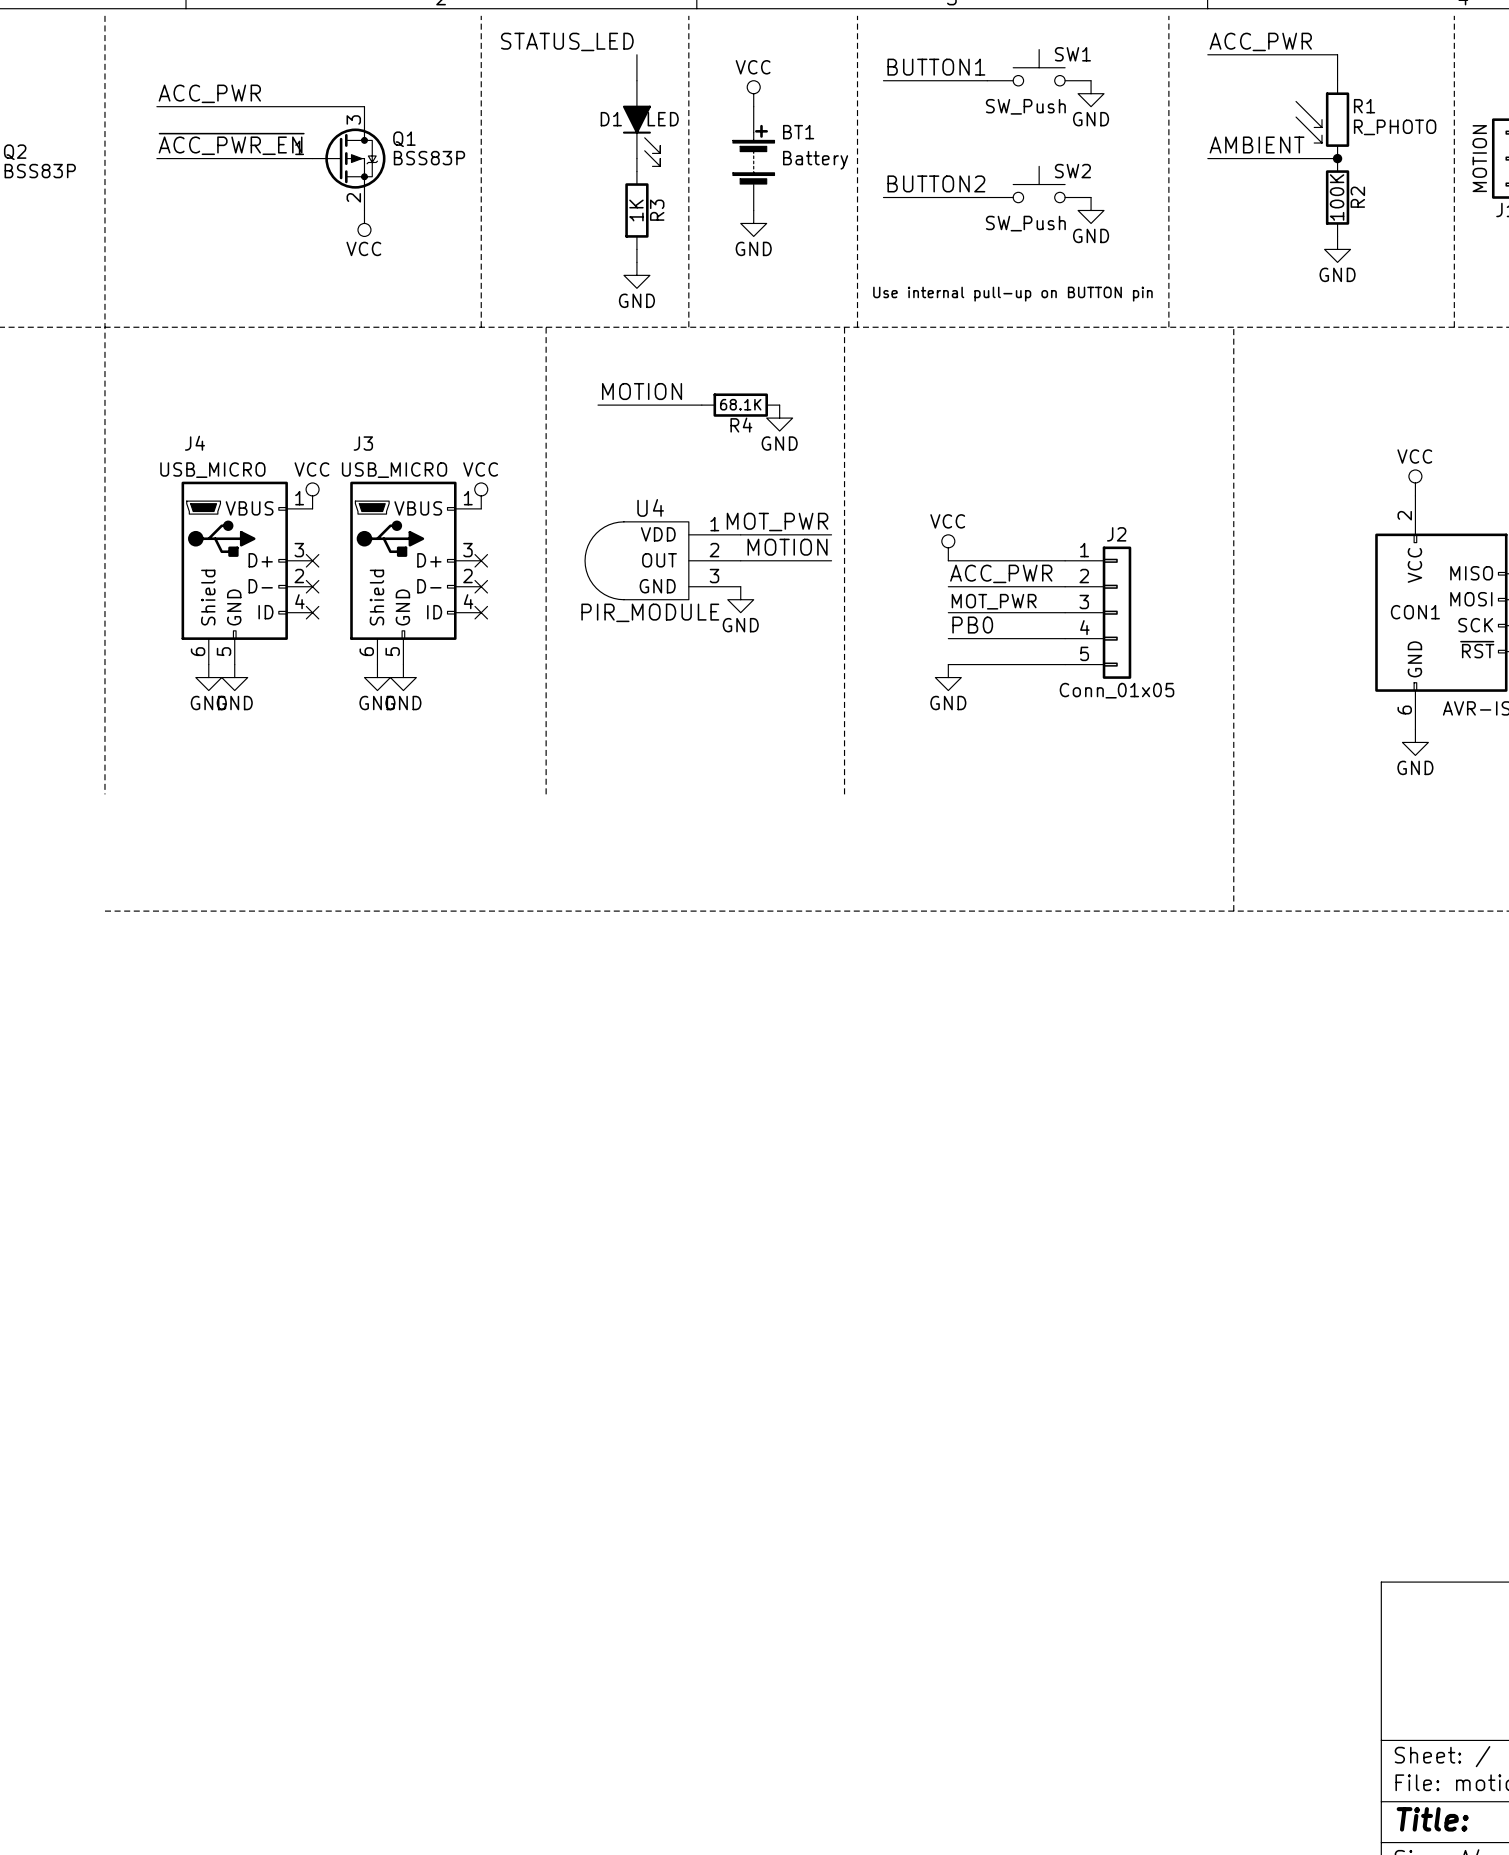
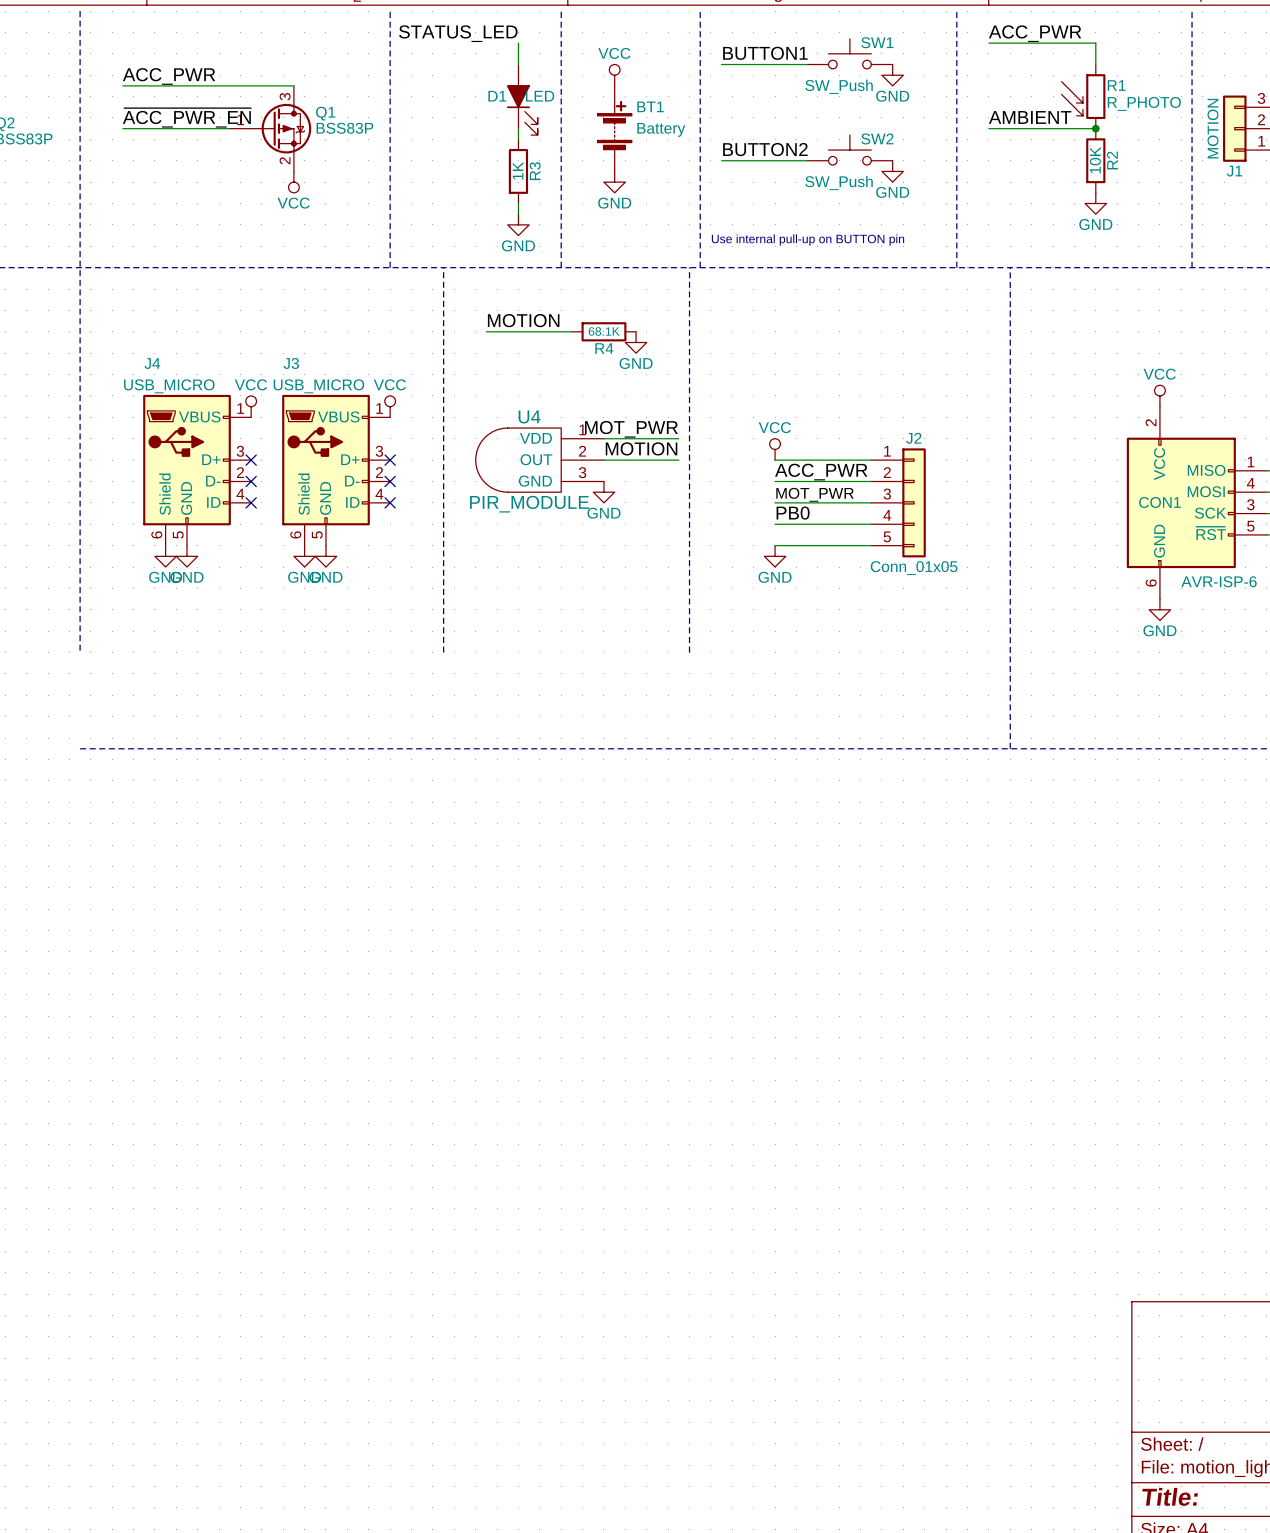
R2 value: 100K (1337, 197) -> 10K (1095, 160)

